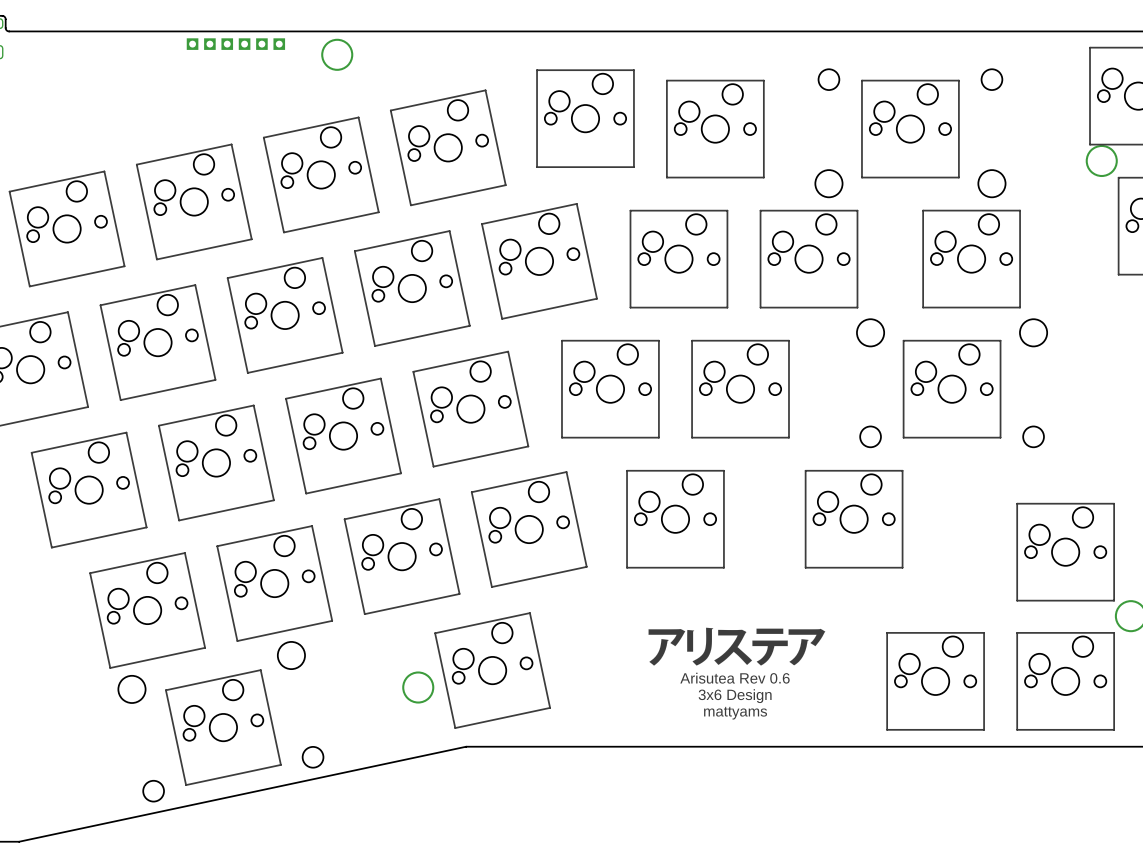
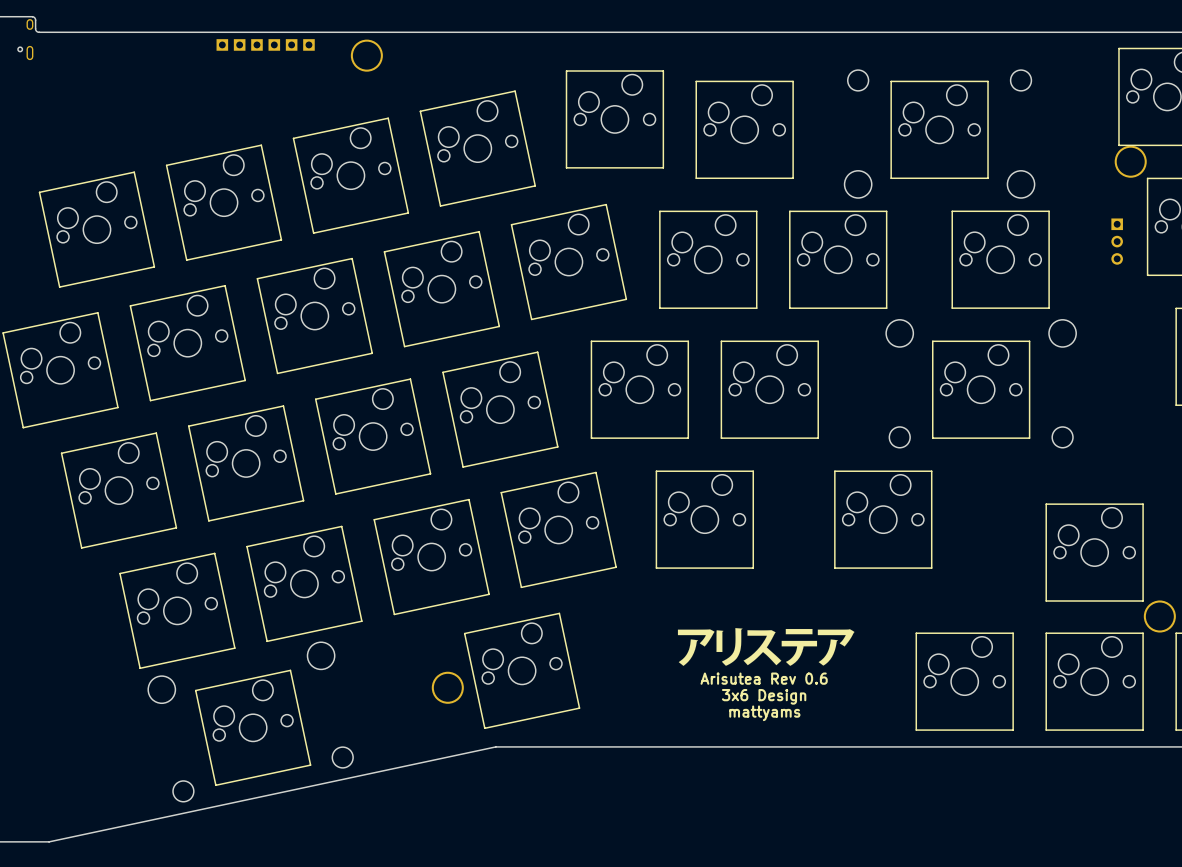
part: none -> (1117, 241)

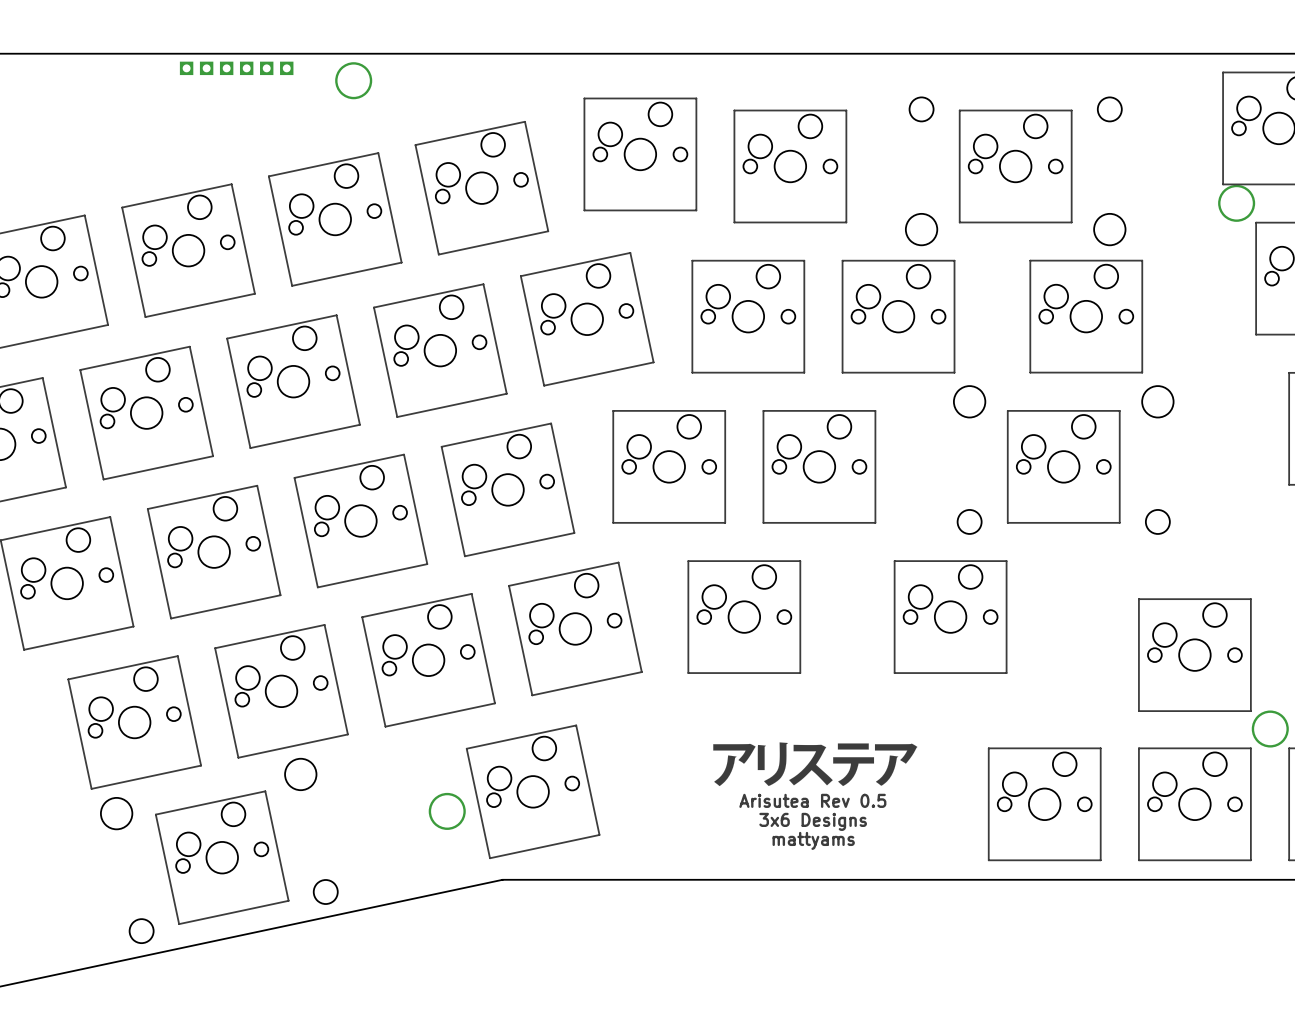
part: (1117, 241) -> none
text: Arisutea Rev 0.6 (764, 678) -> Arisutea Rev 0.5 (812, 800)
text: 3x6 Design (764, 696) -> 3x6 Designs (813, 821)

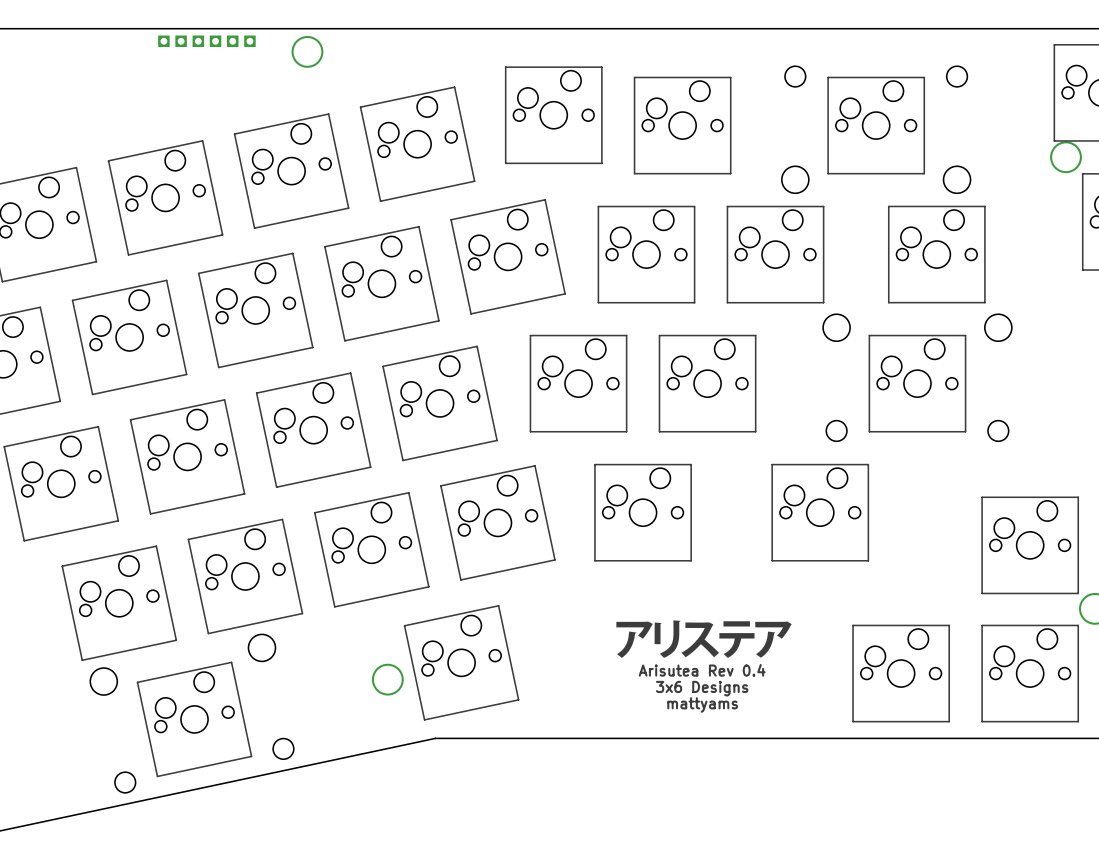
text: Arisutea Rev 0.5 (812, 800) -> Arisutea Rev 0.4 (702, 670)

